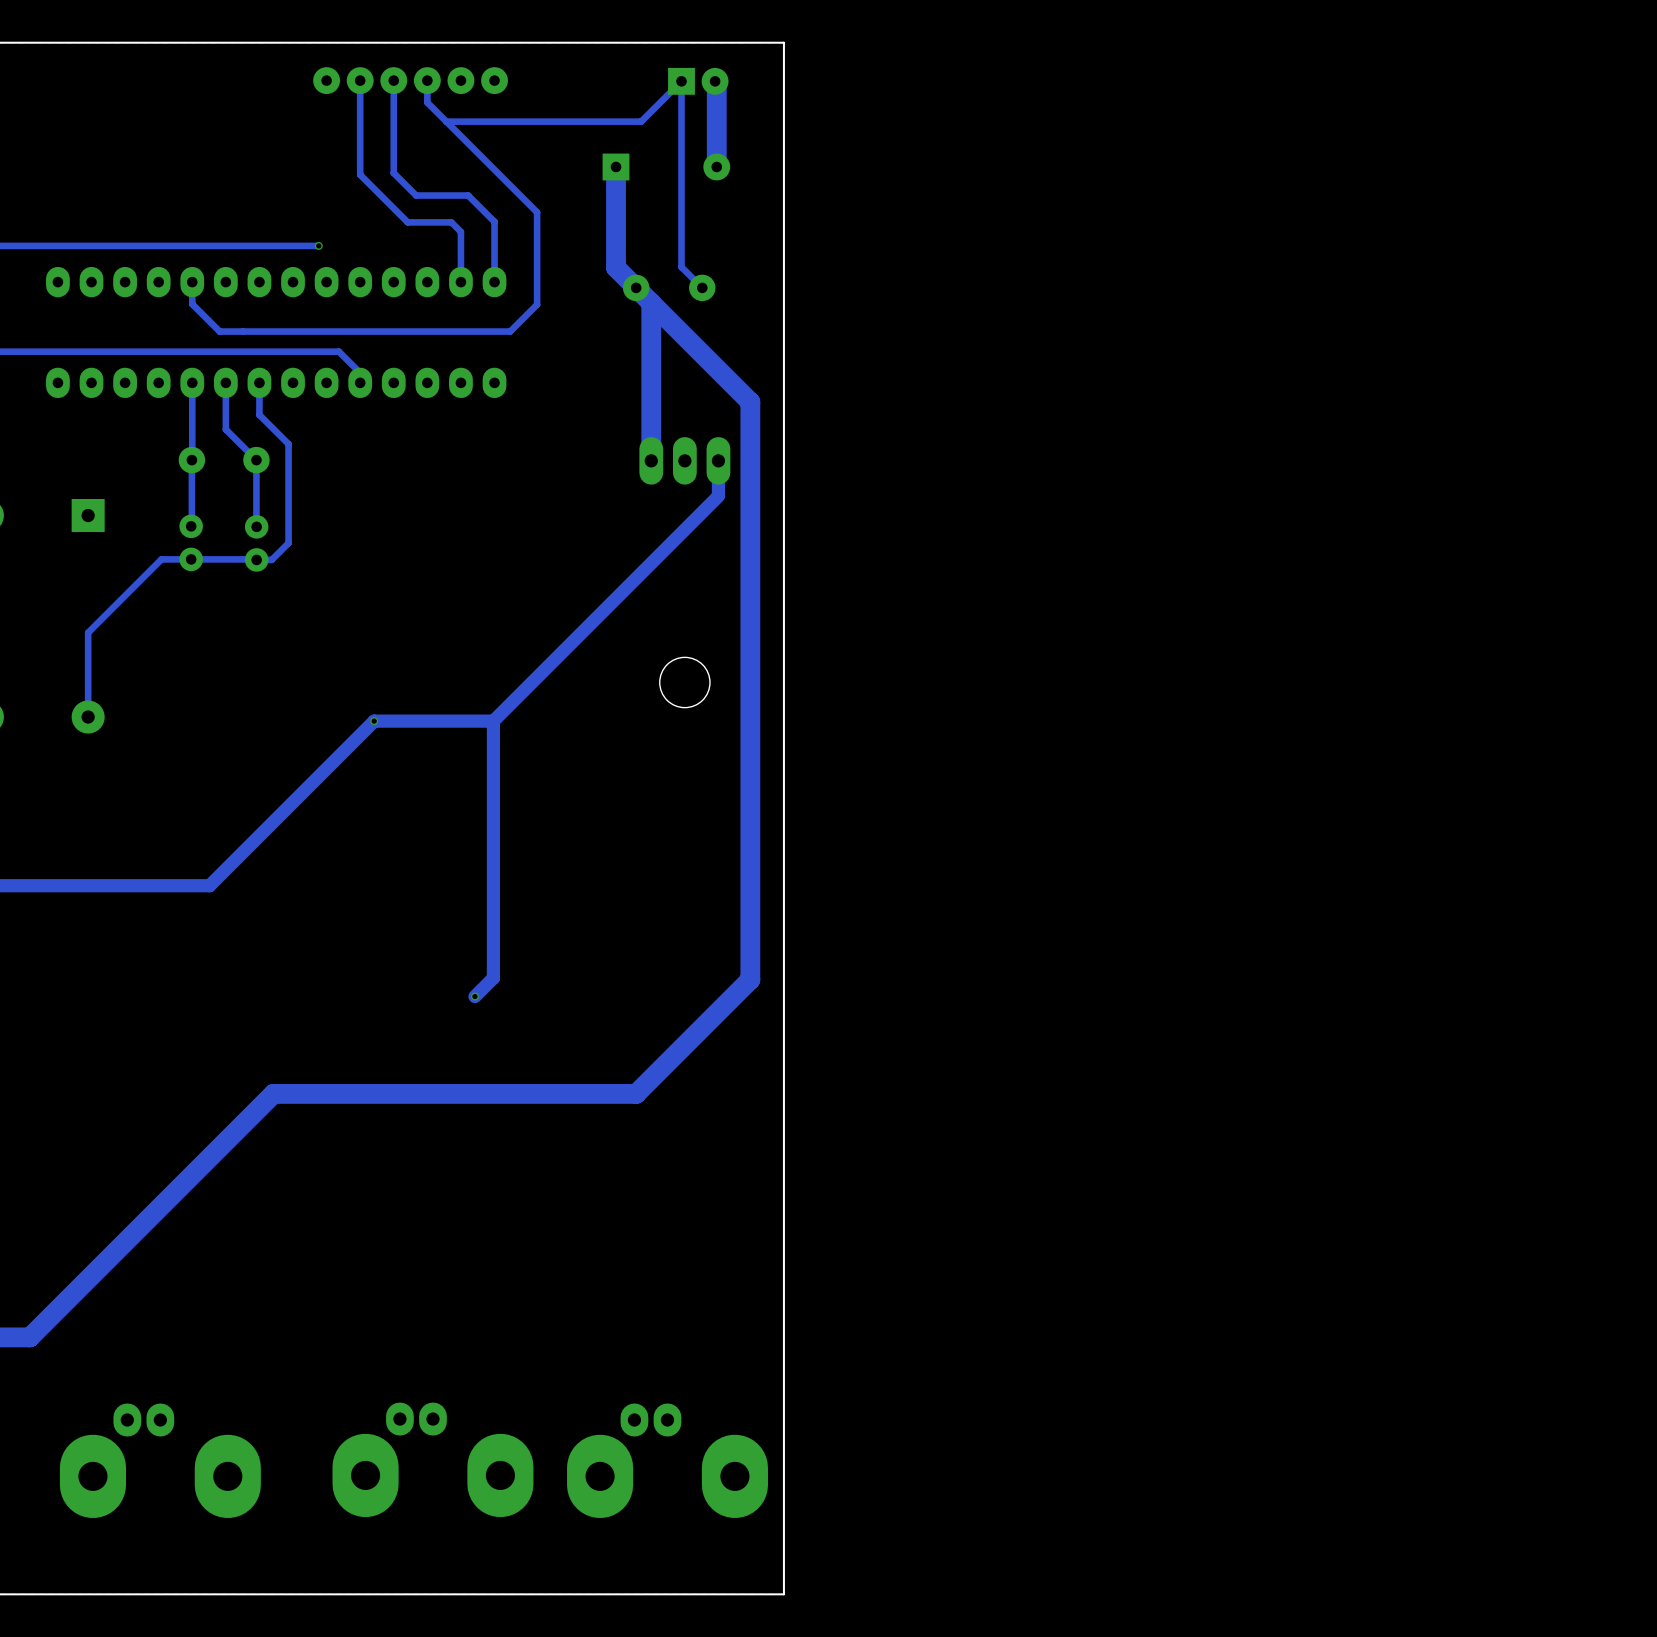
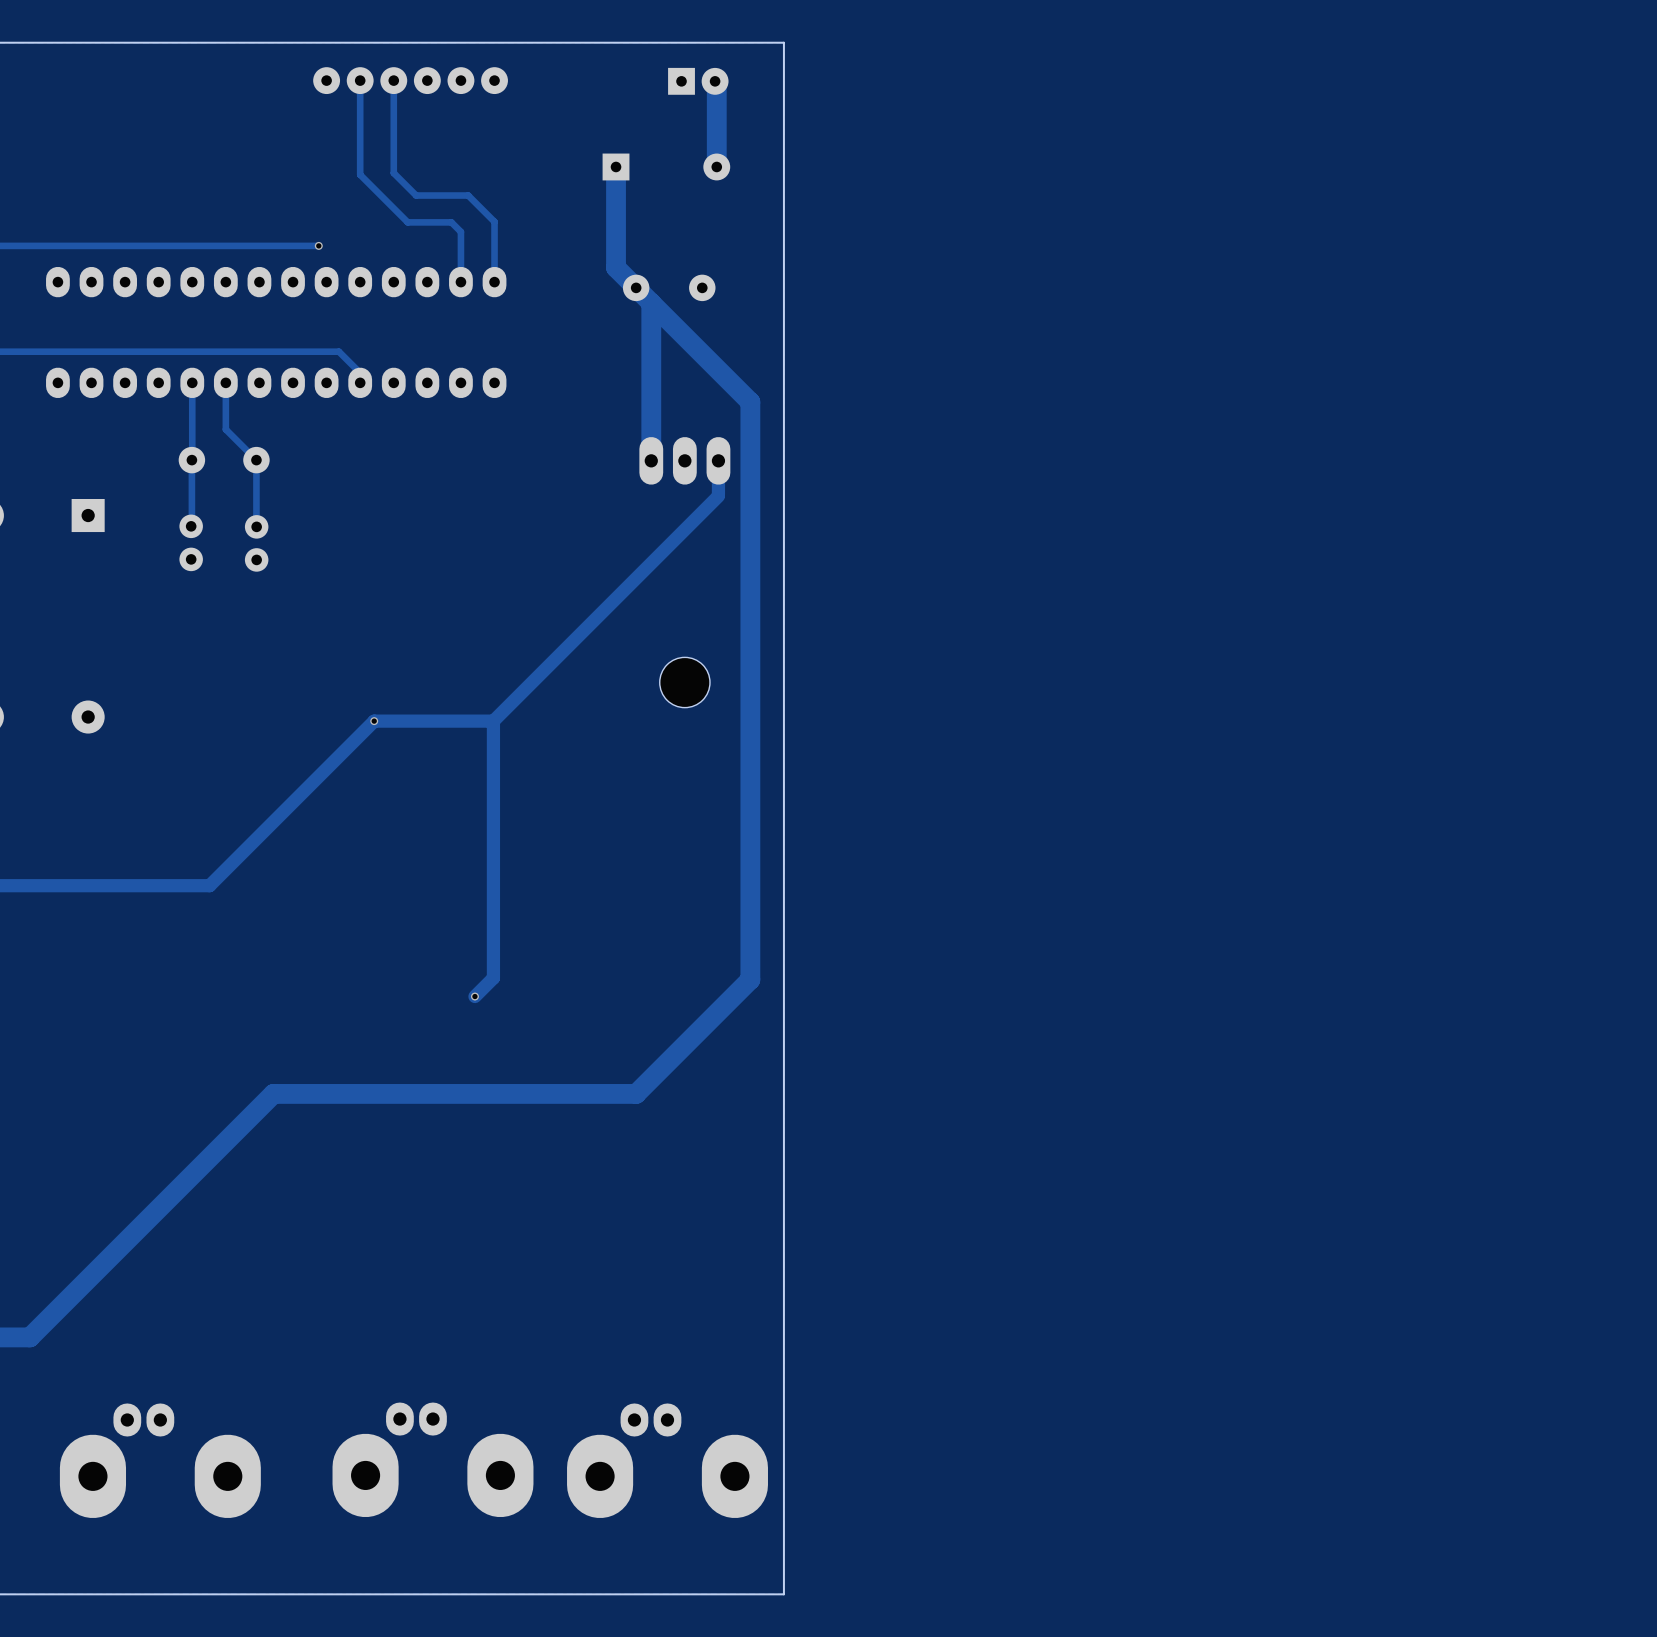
track: (427, 80) (427, 102) (537, 212) (537, 304) (510, 331) (219, 331) (192, 304) (192, 282) -> none
track: (446, 121) (641, 121) (681, 81) (681, 267) (702, 287) -> none
track: (259, 382) (259, 414) (288, 444) (288, 543) (271, 559) (256, 559) -> none
track: (256, 559) (161, 559) (88, 632) (88, 717) -> none

